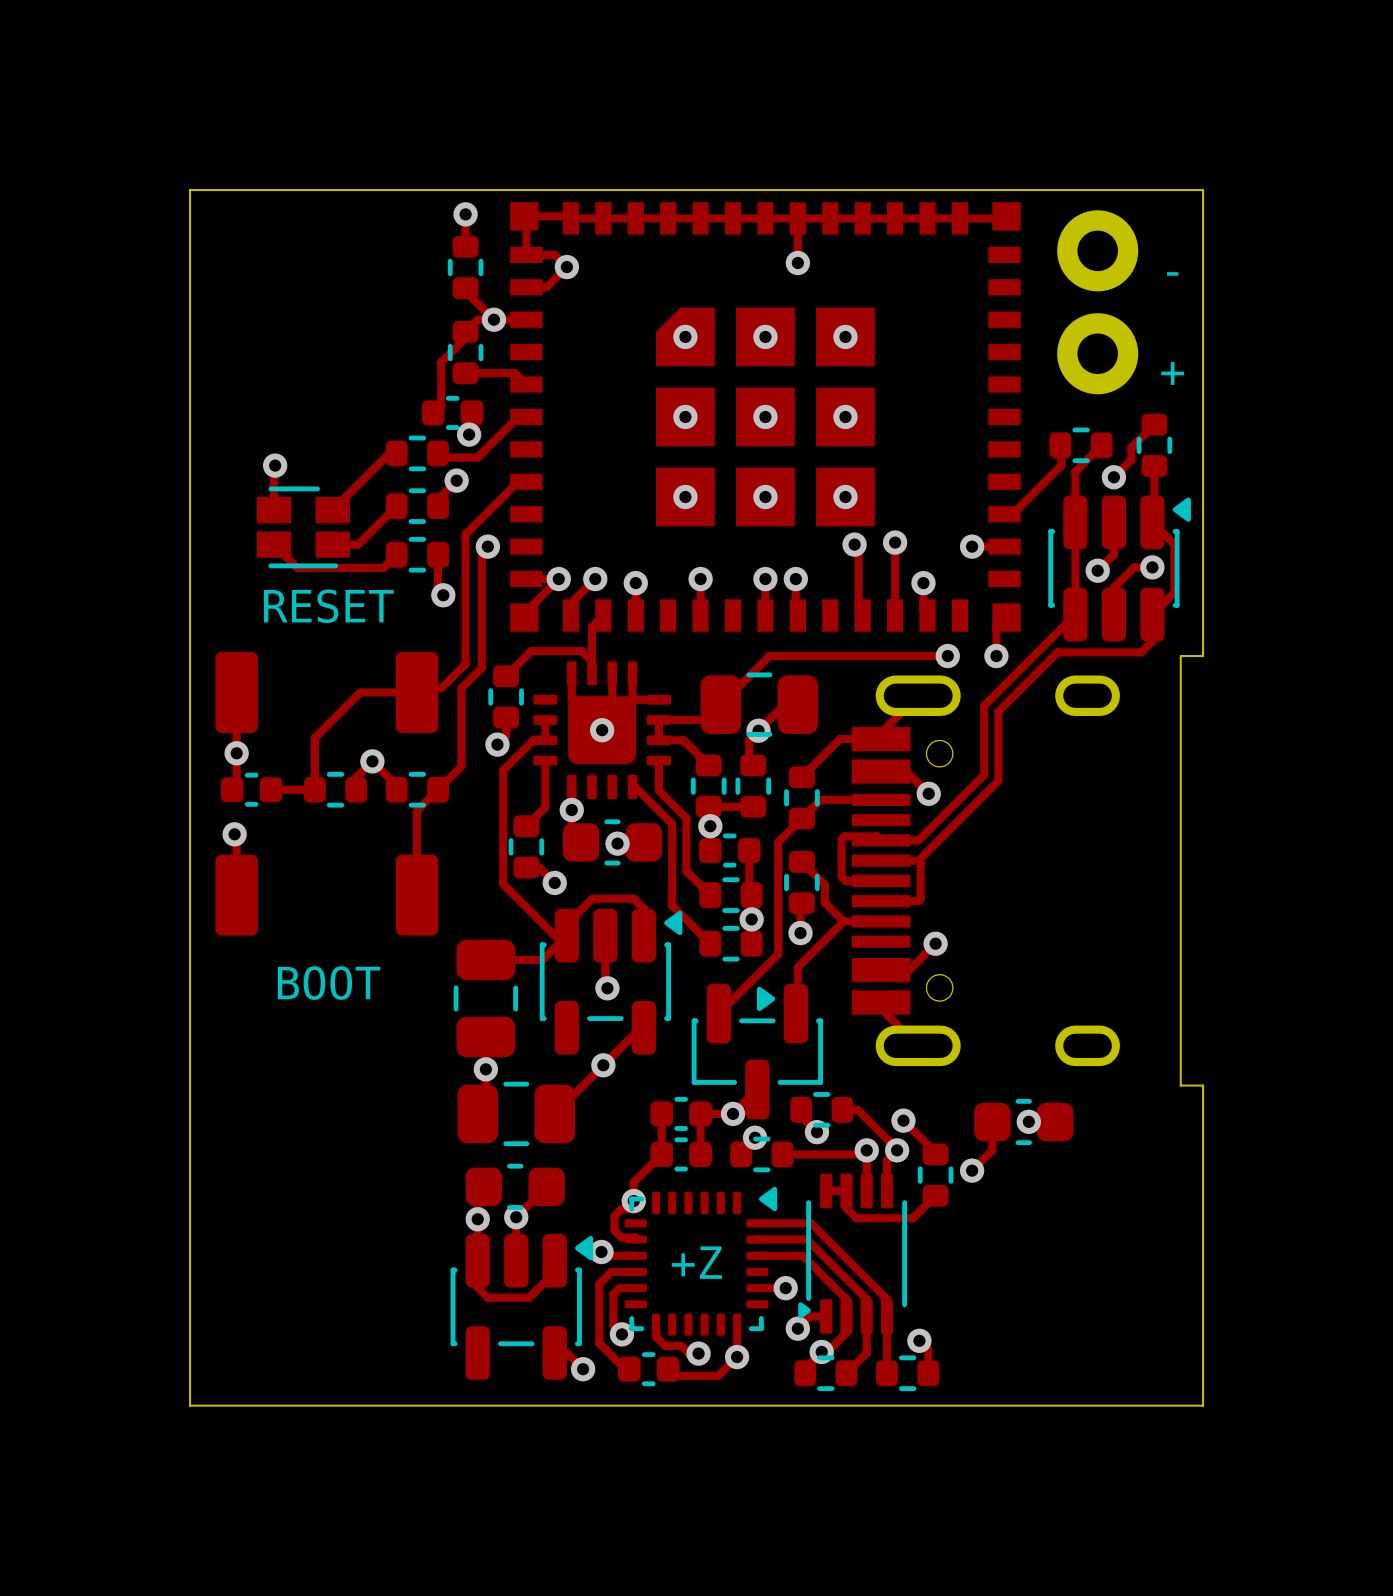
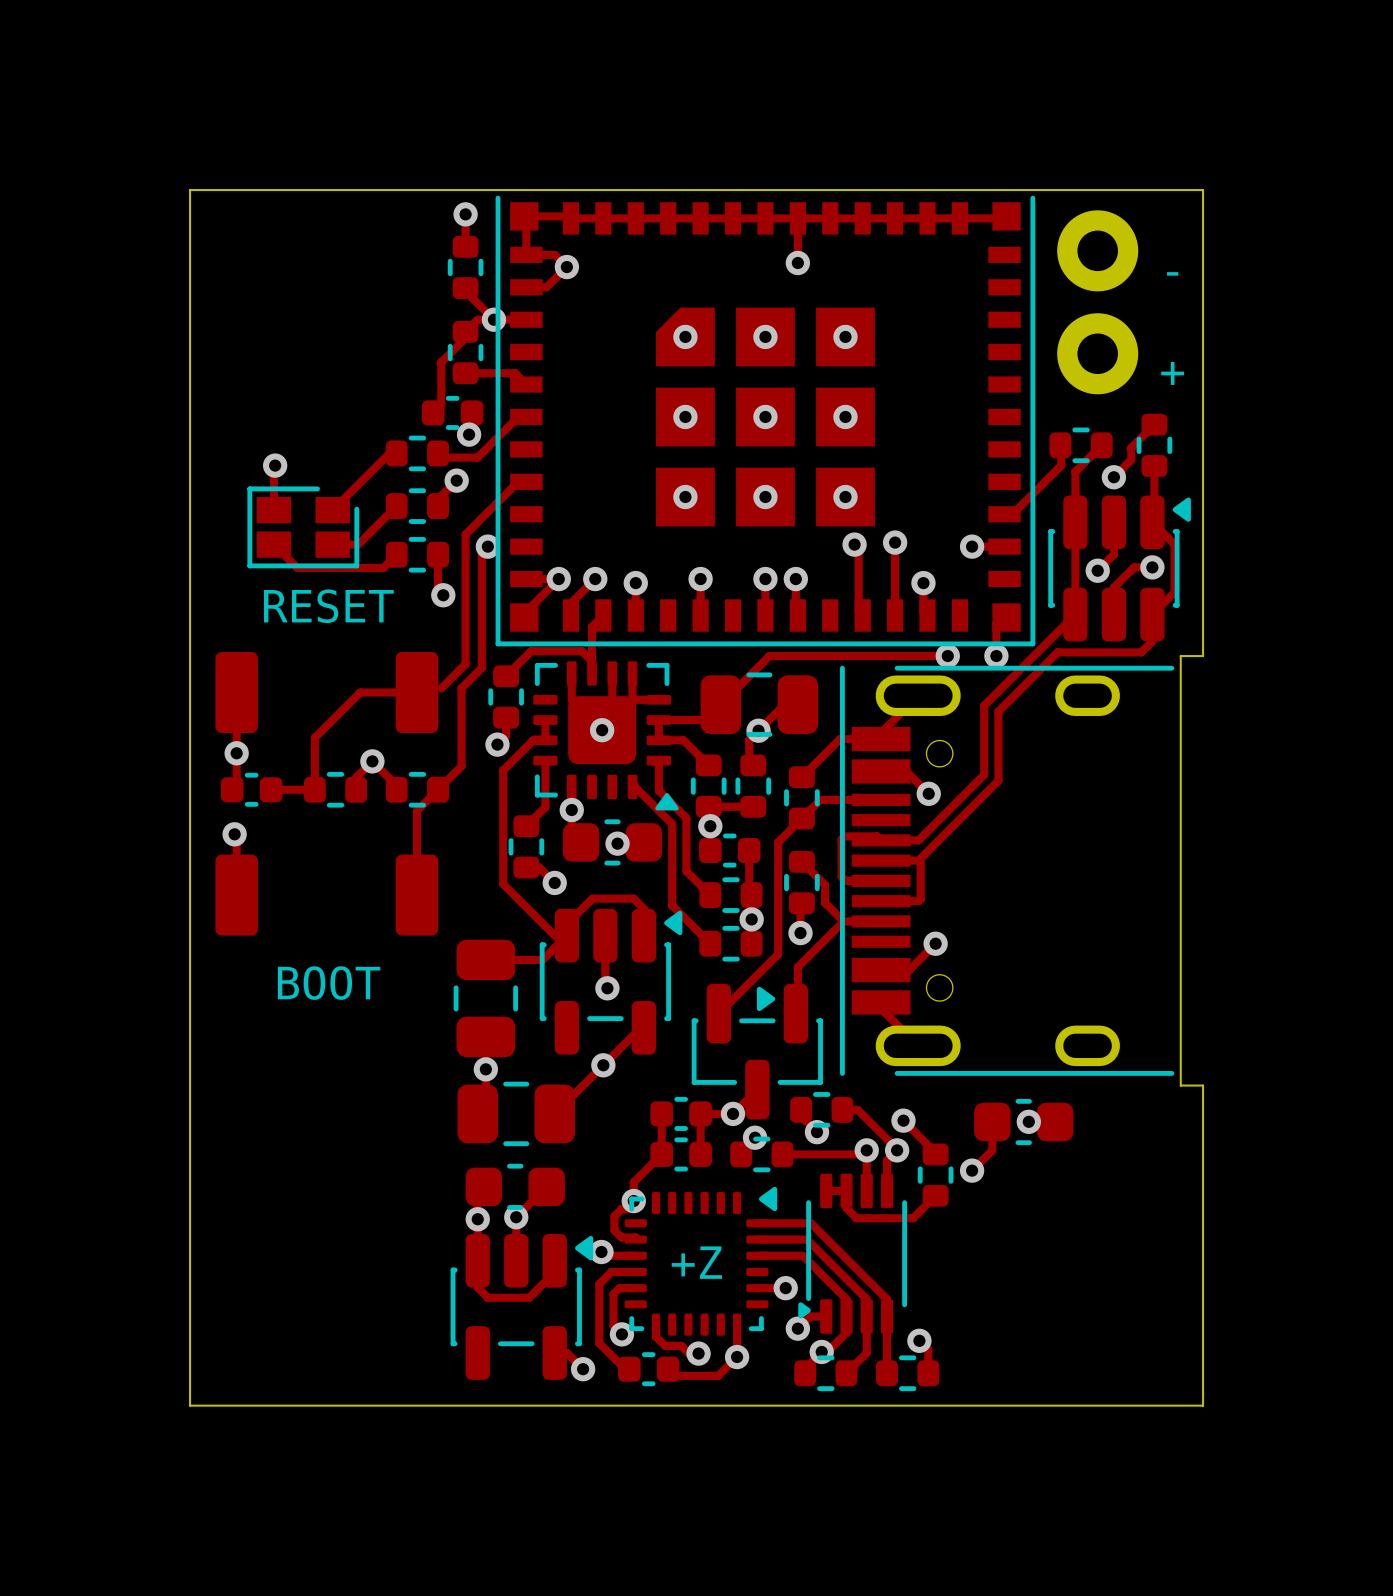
part footprint: [510, 202, 1021, 632] -> [495, 195, 1036, 647]
part footprint: [256, 486, 350, 569] -> [247, 486, 360, 569]
part footprint: [533, 661, 672, 800] -> [533, 661, 679, 811]
part footprint: [851, 675, 1120, 1067] -> [840, 665, 1175, 1076]

